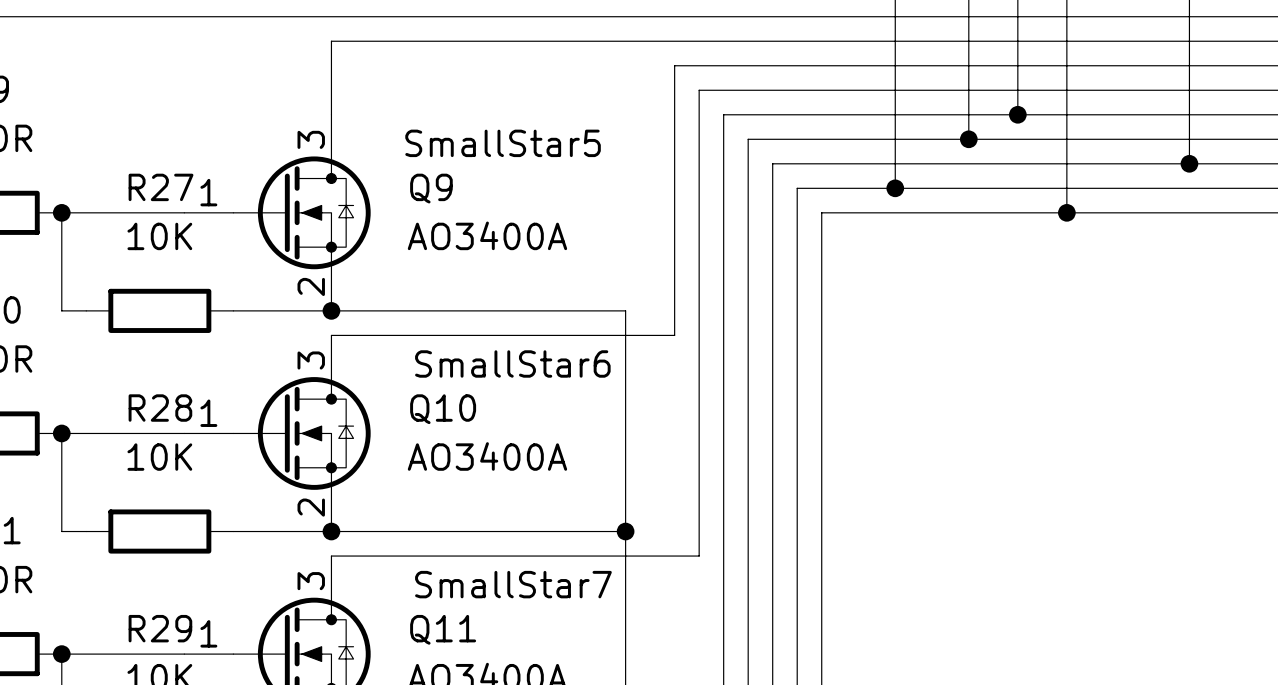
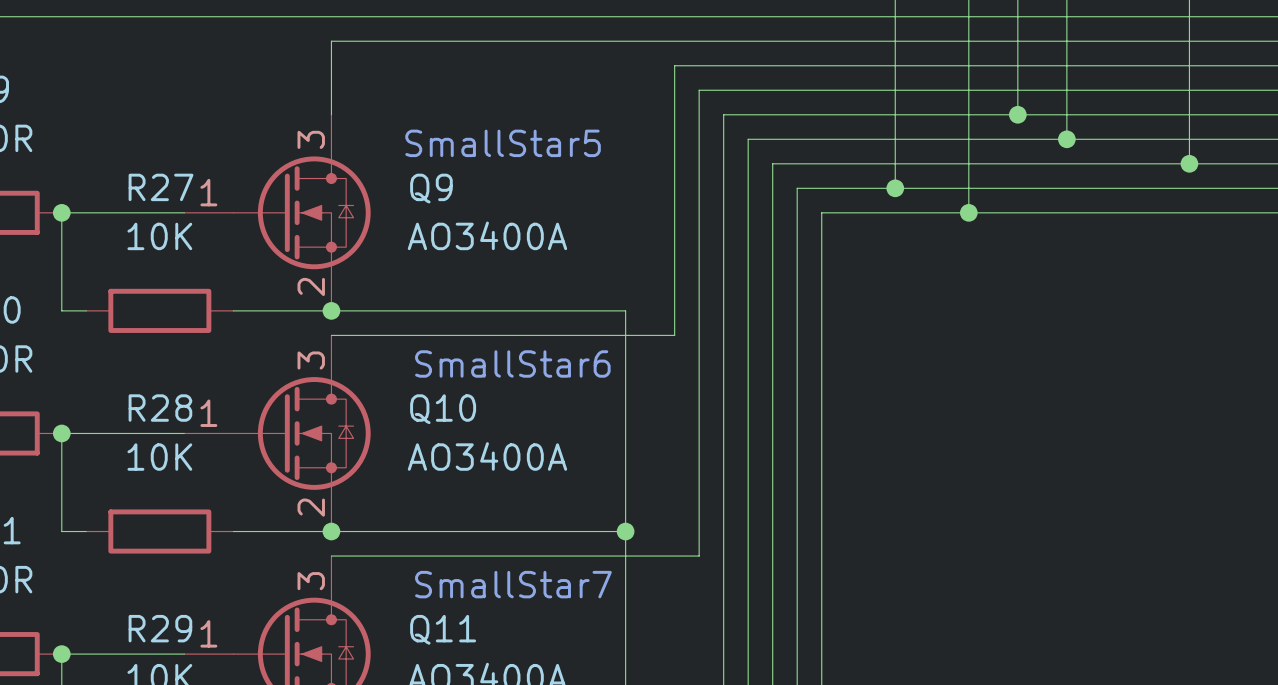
junction: (968, 139) -> none
wire: (1066, 139) (1066, 212) -> (968, 139) (968, 212)
junction: none -> (1066, 139)
junction: none -> (968, 212)
junction: (1066, 212) -> none

